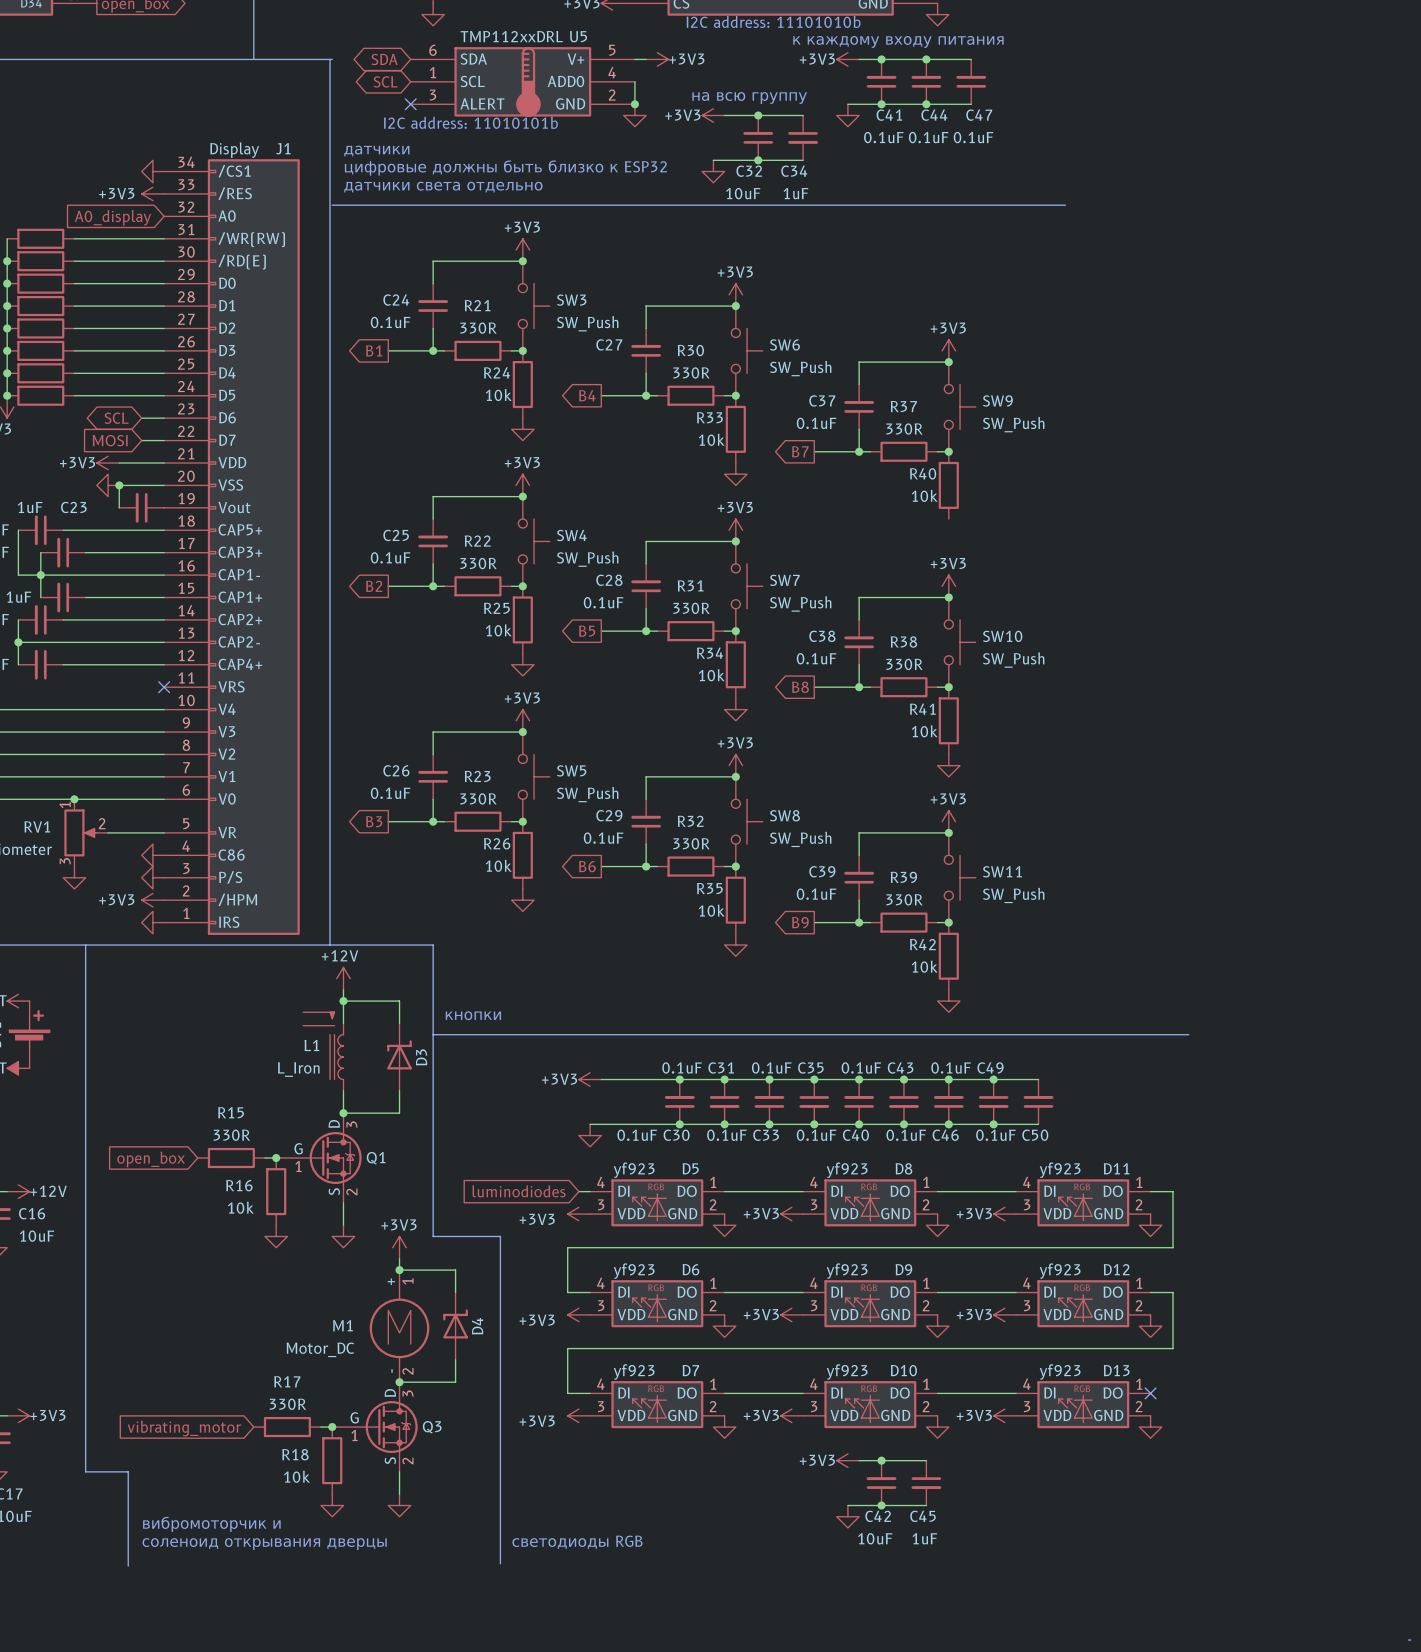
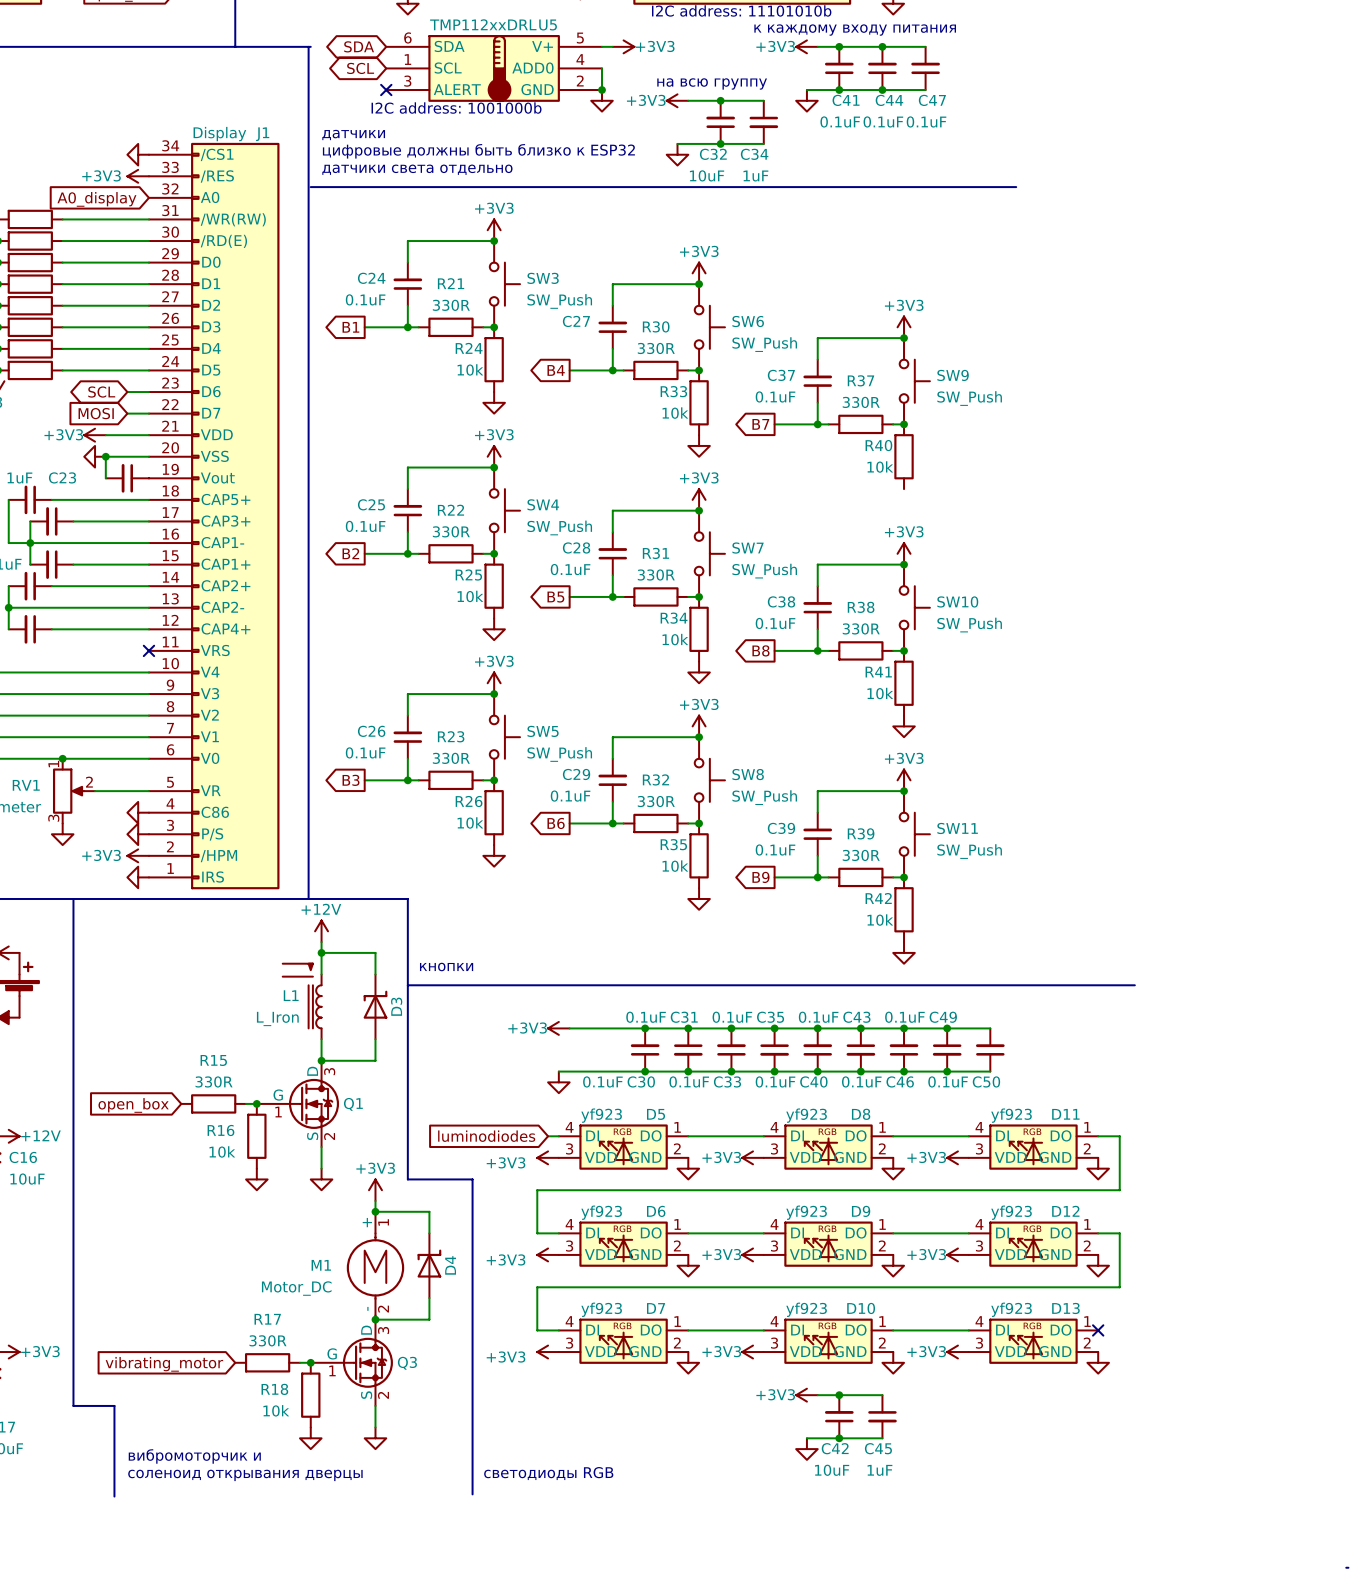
text: I2C address: 11010101b (470, 122) -> I2C address: 1001000b (456, 108)

